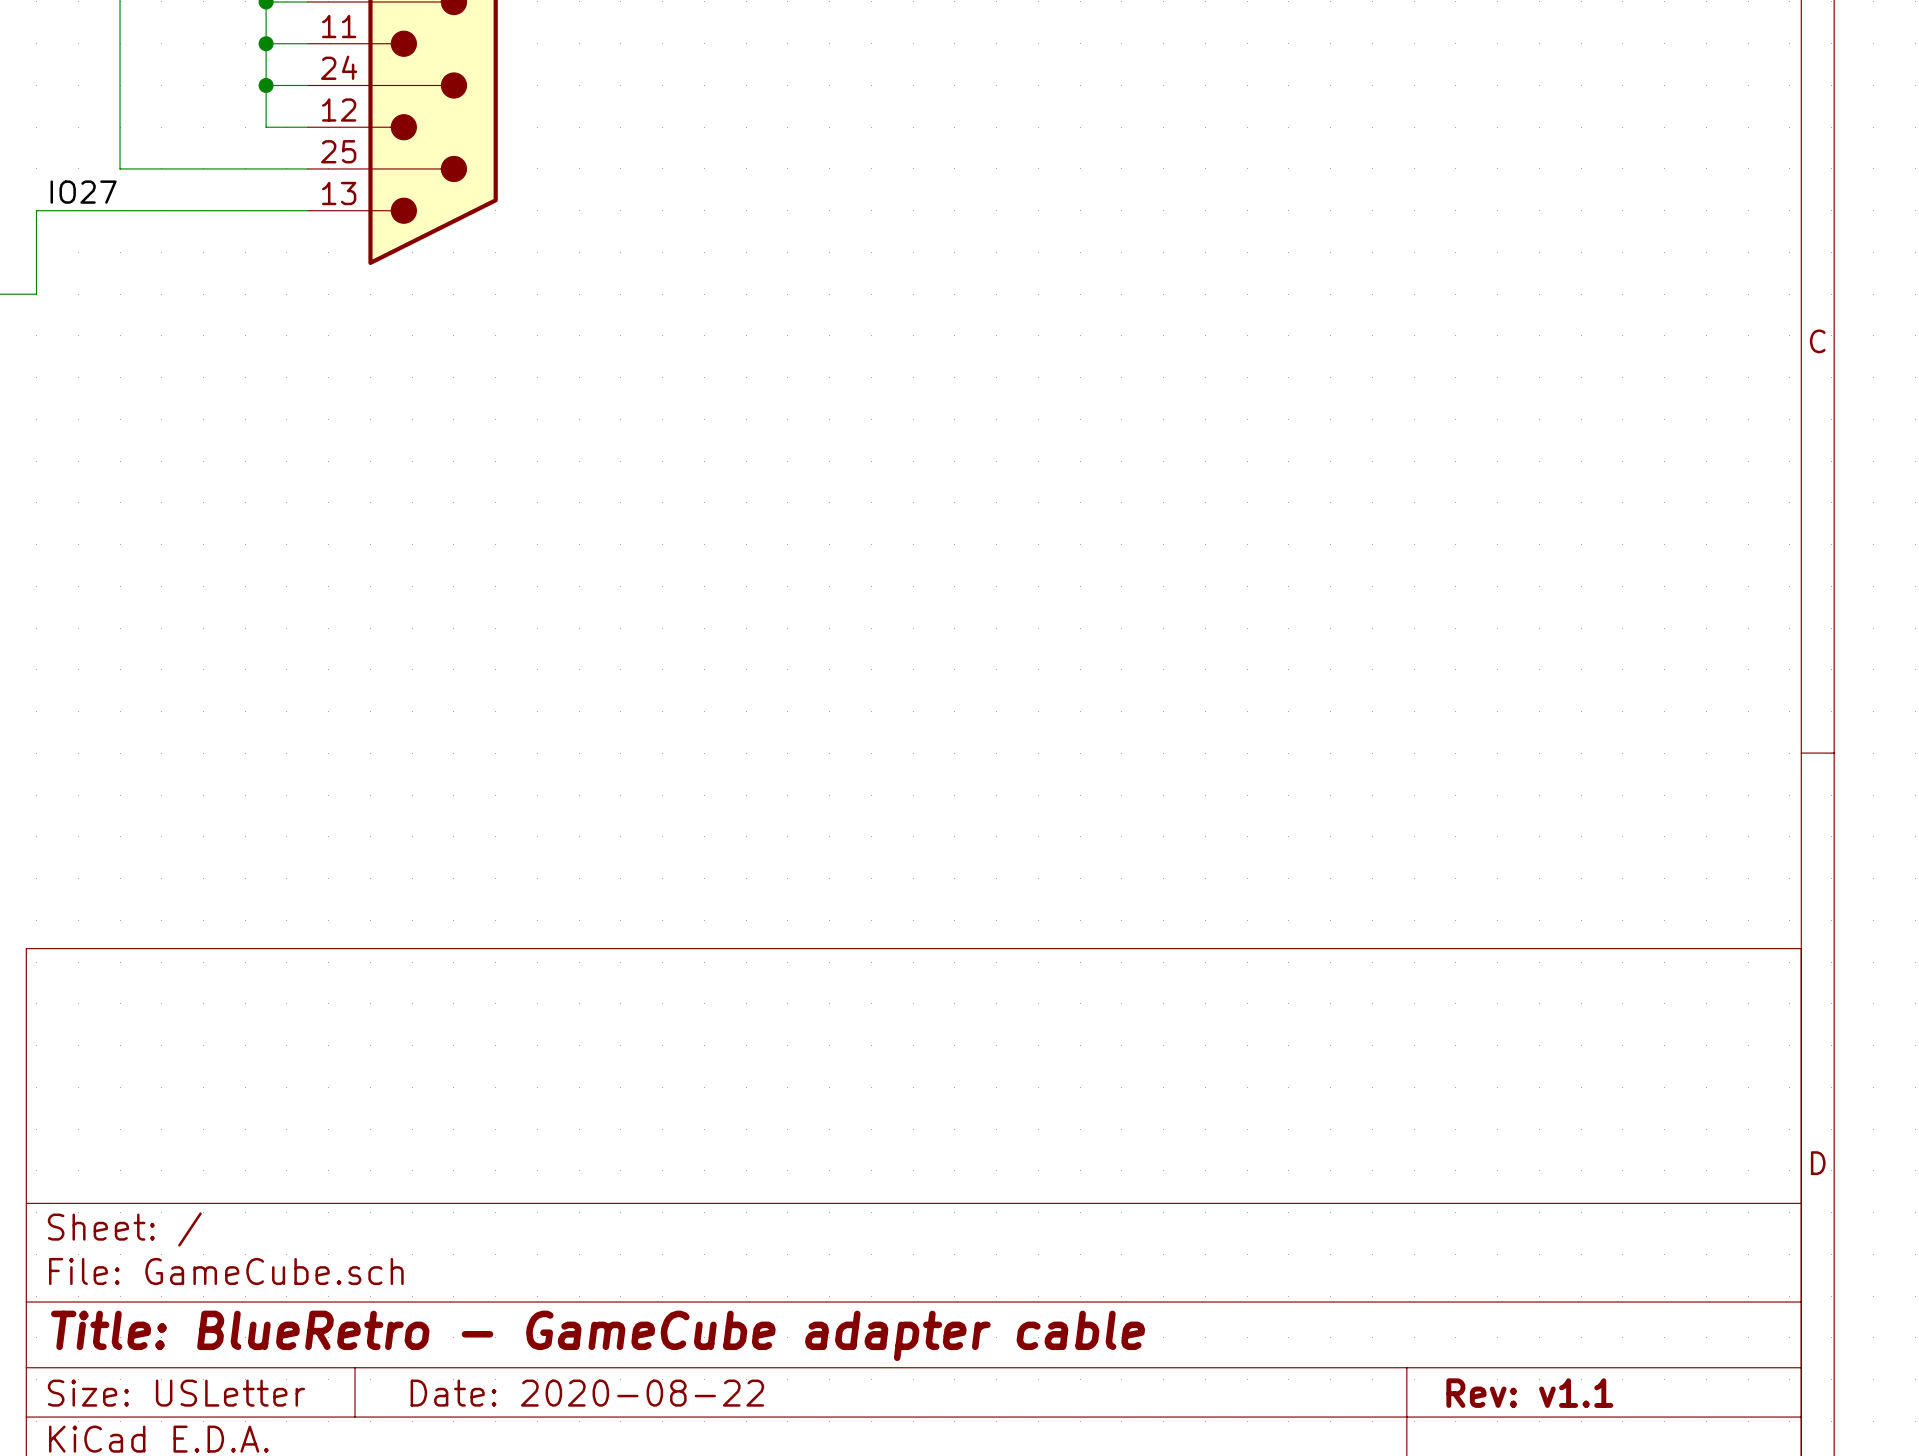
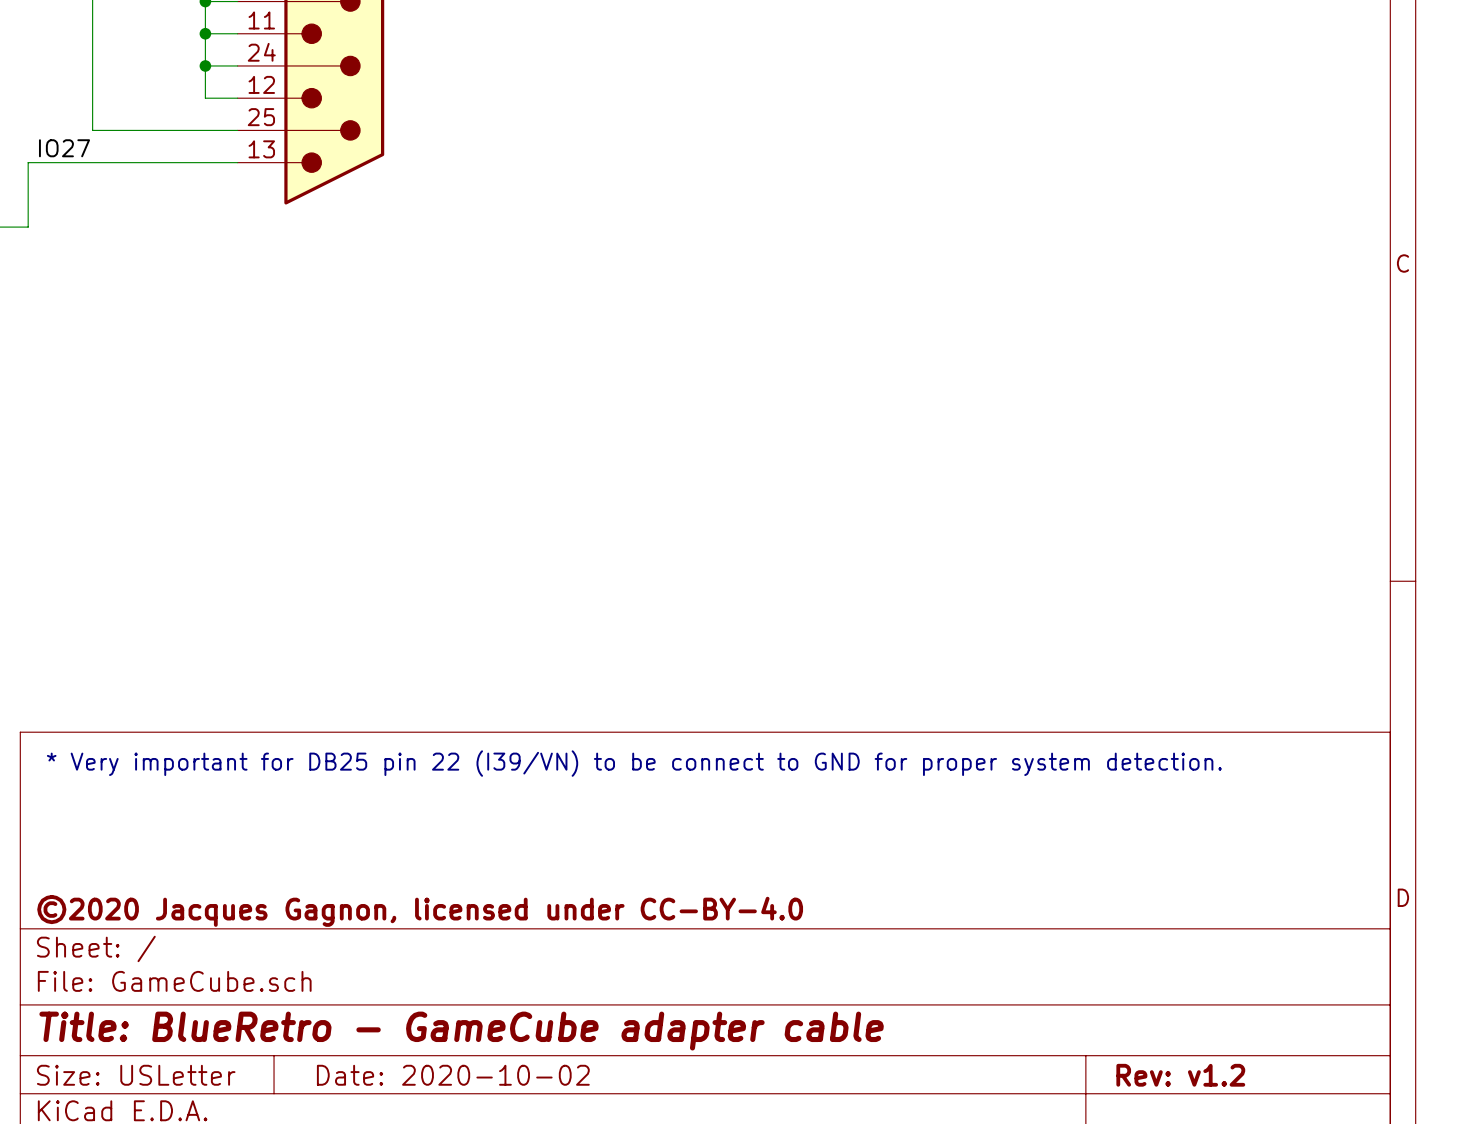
text: none -> * Very important for DB25 pin 22 (I39/VN) to be connect to GND for proper system detection. (634, 763)
title block: none -> ©2020 Jacques Gagnon, licensed under CC-BY-4.0 (420, 910)
title block: Date: 2020-08-22 (587, 1393) -> Date: 2020-10-02 (453, 1075)
title block: Rev: v1.1 (1529, 1393) -> Rev: v1.2 (1180, 1075)

